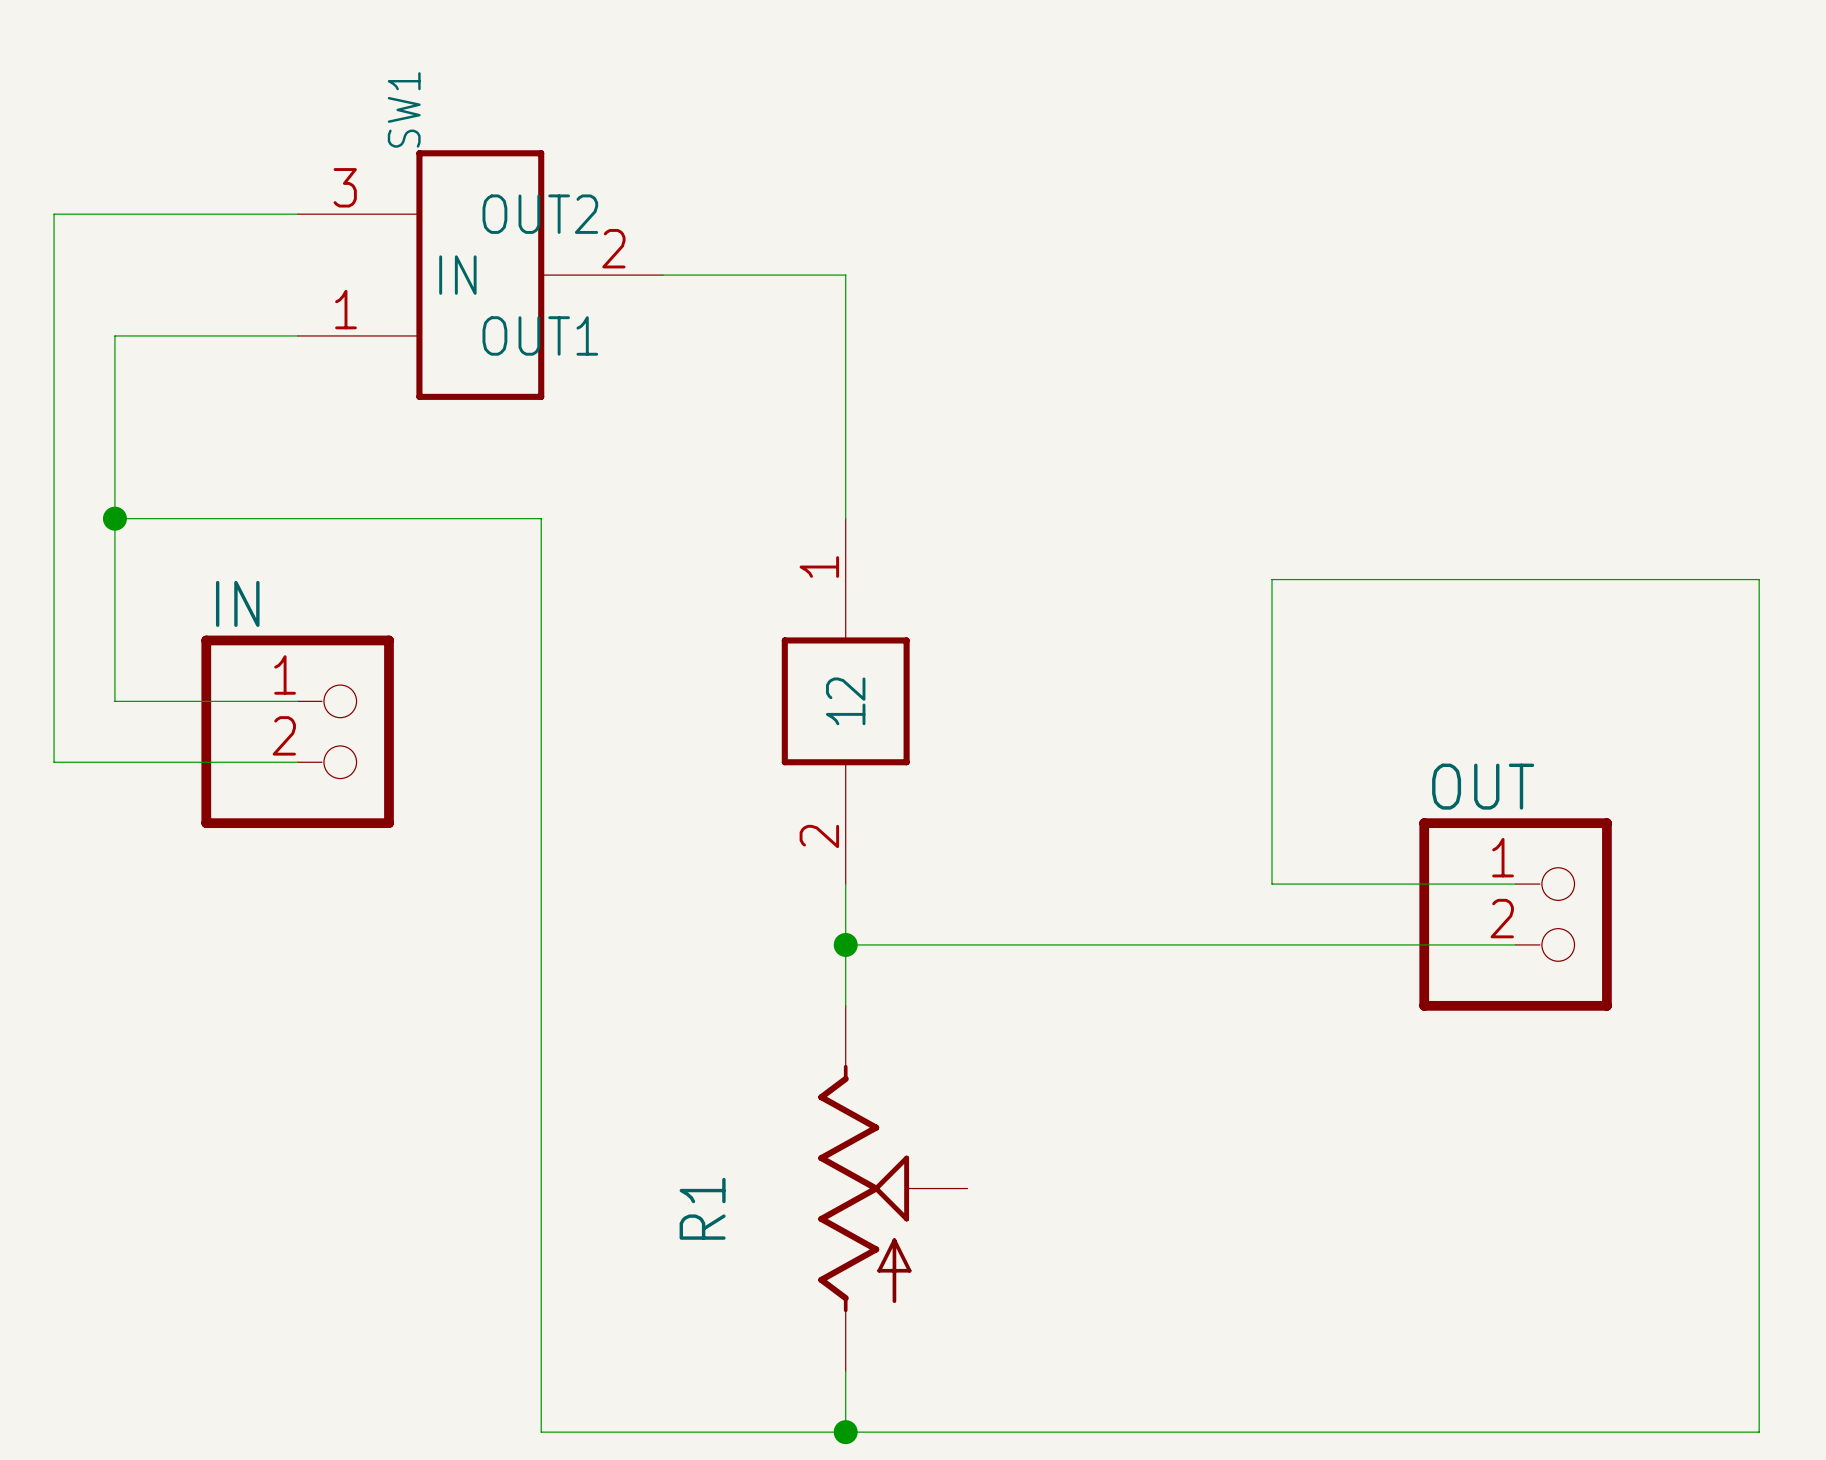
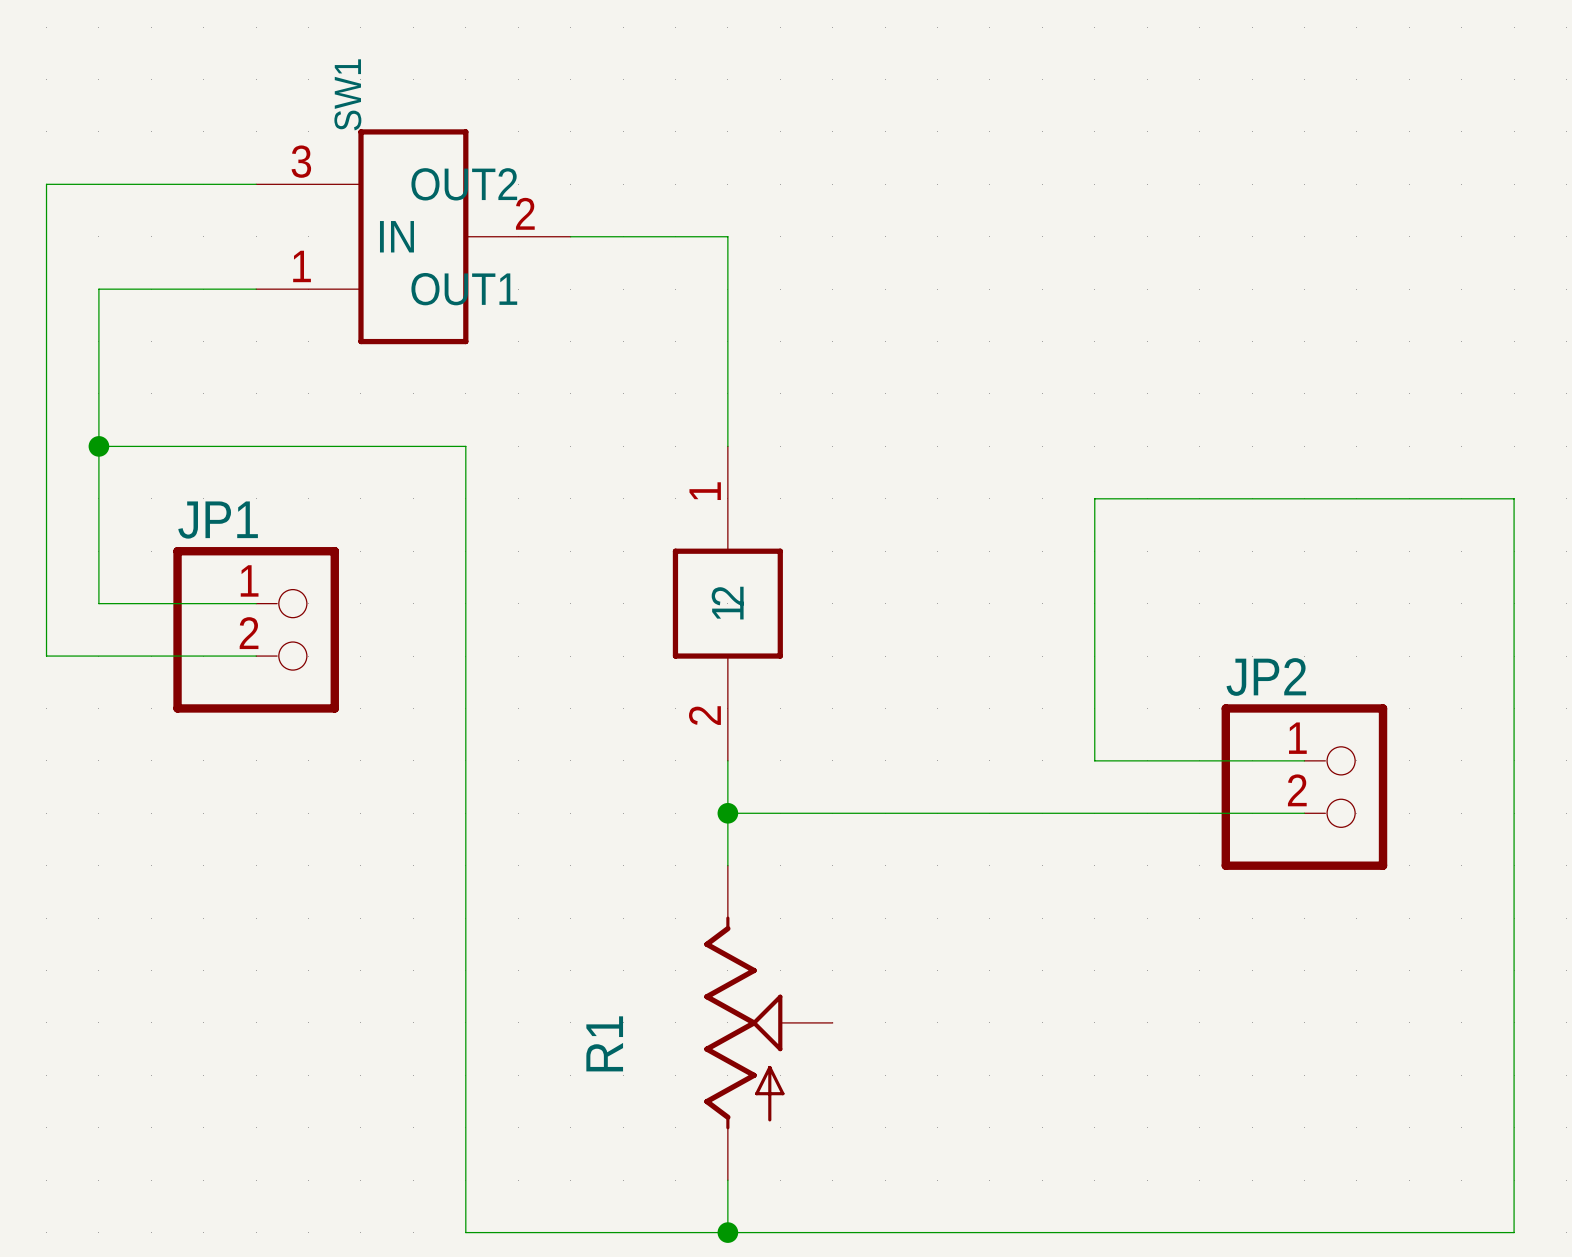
IN name: IN (237, 603) -> JP1 (218, 520)
OUT name: OUT (1483, 786) -> JP2 (1266, 677)

